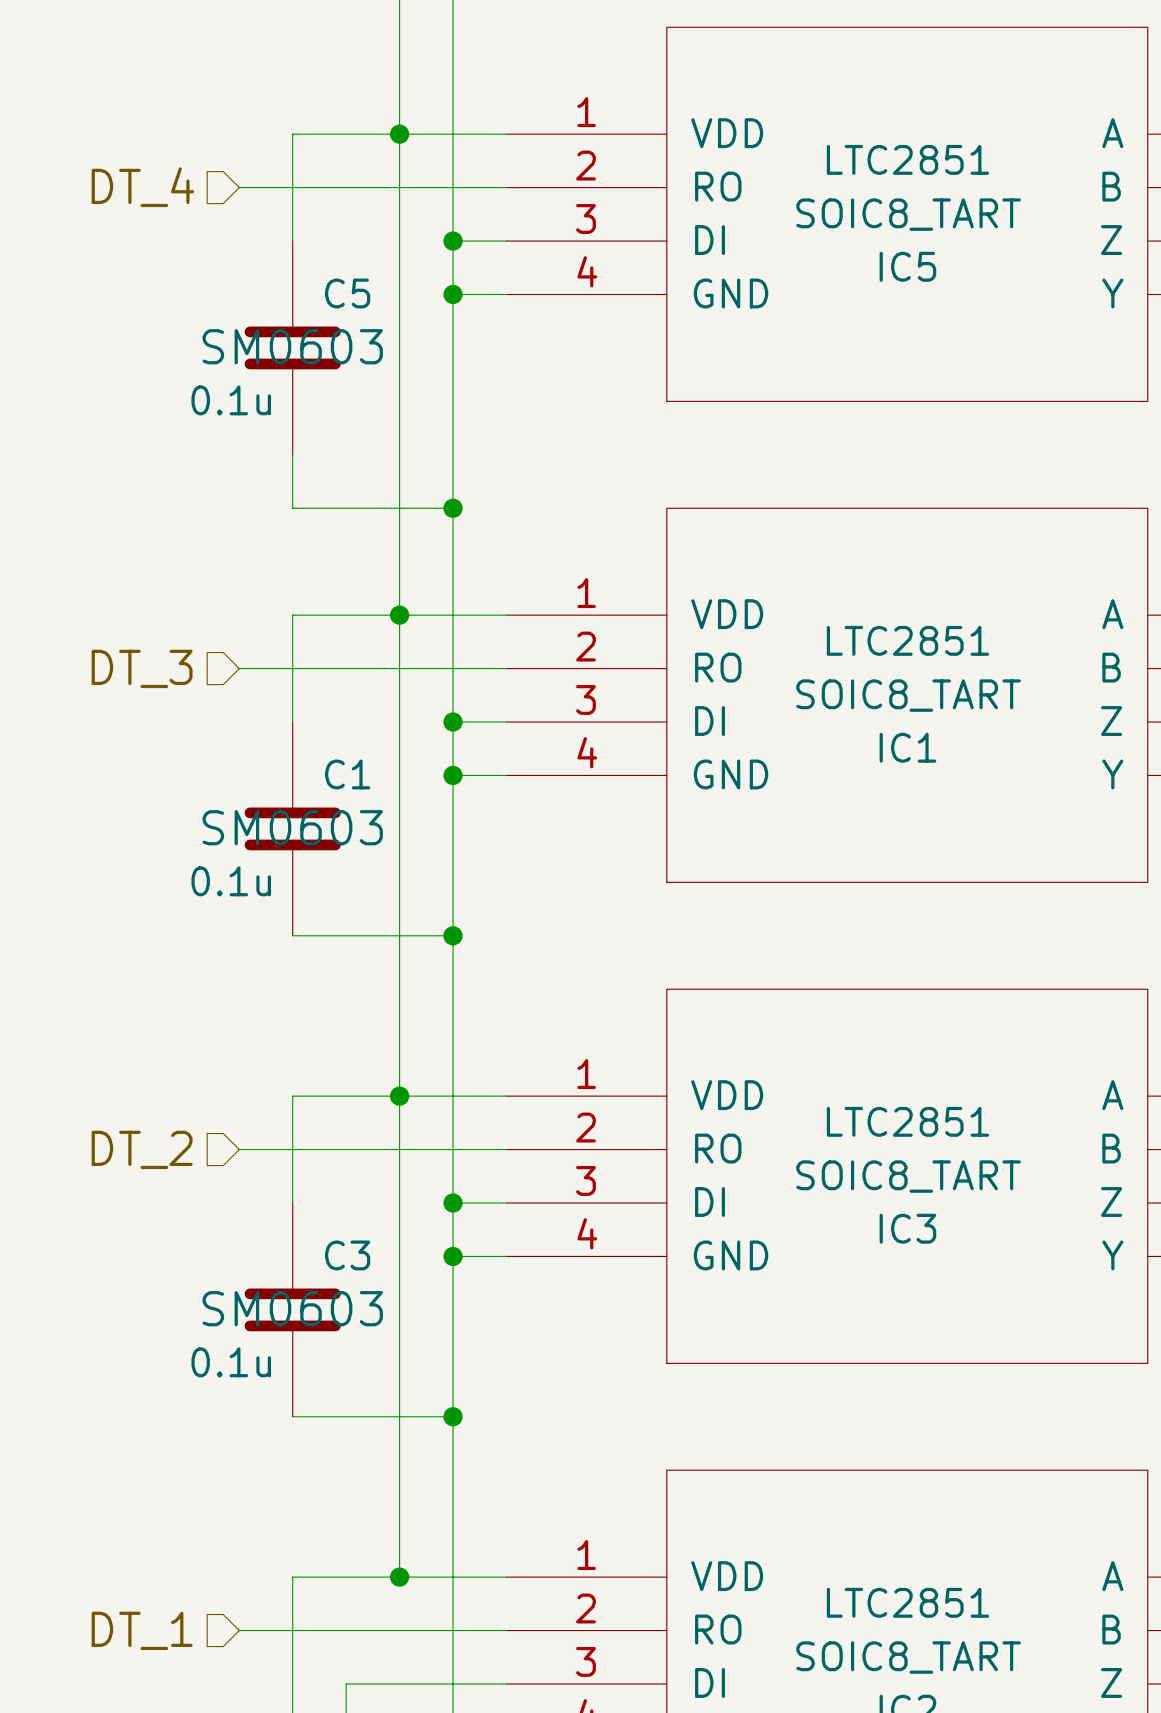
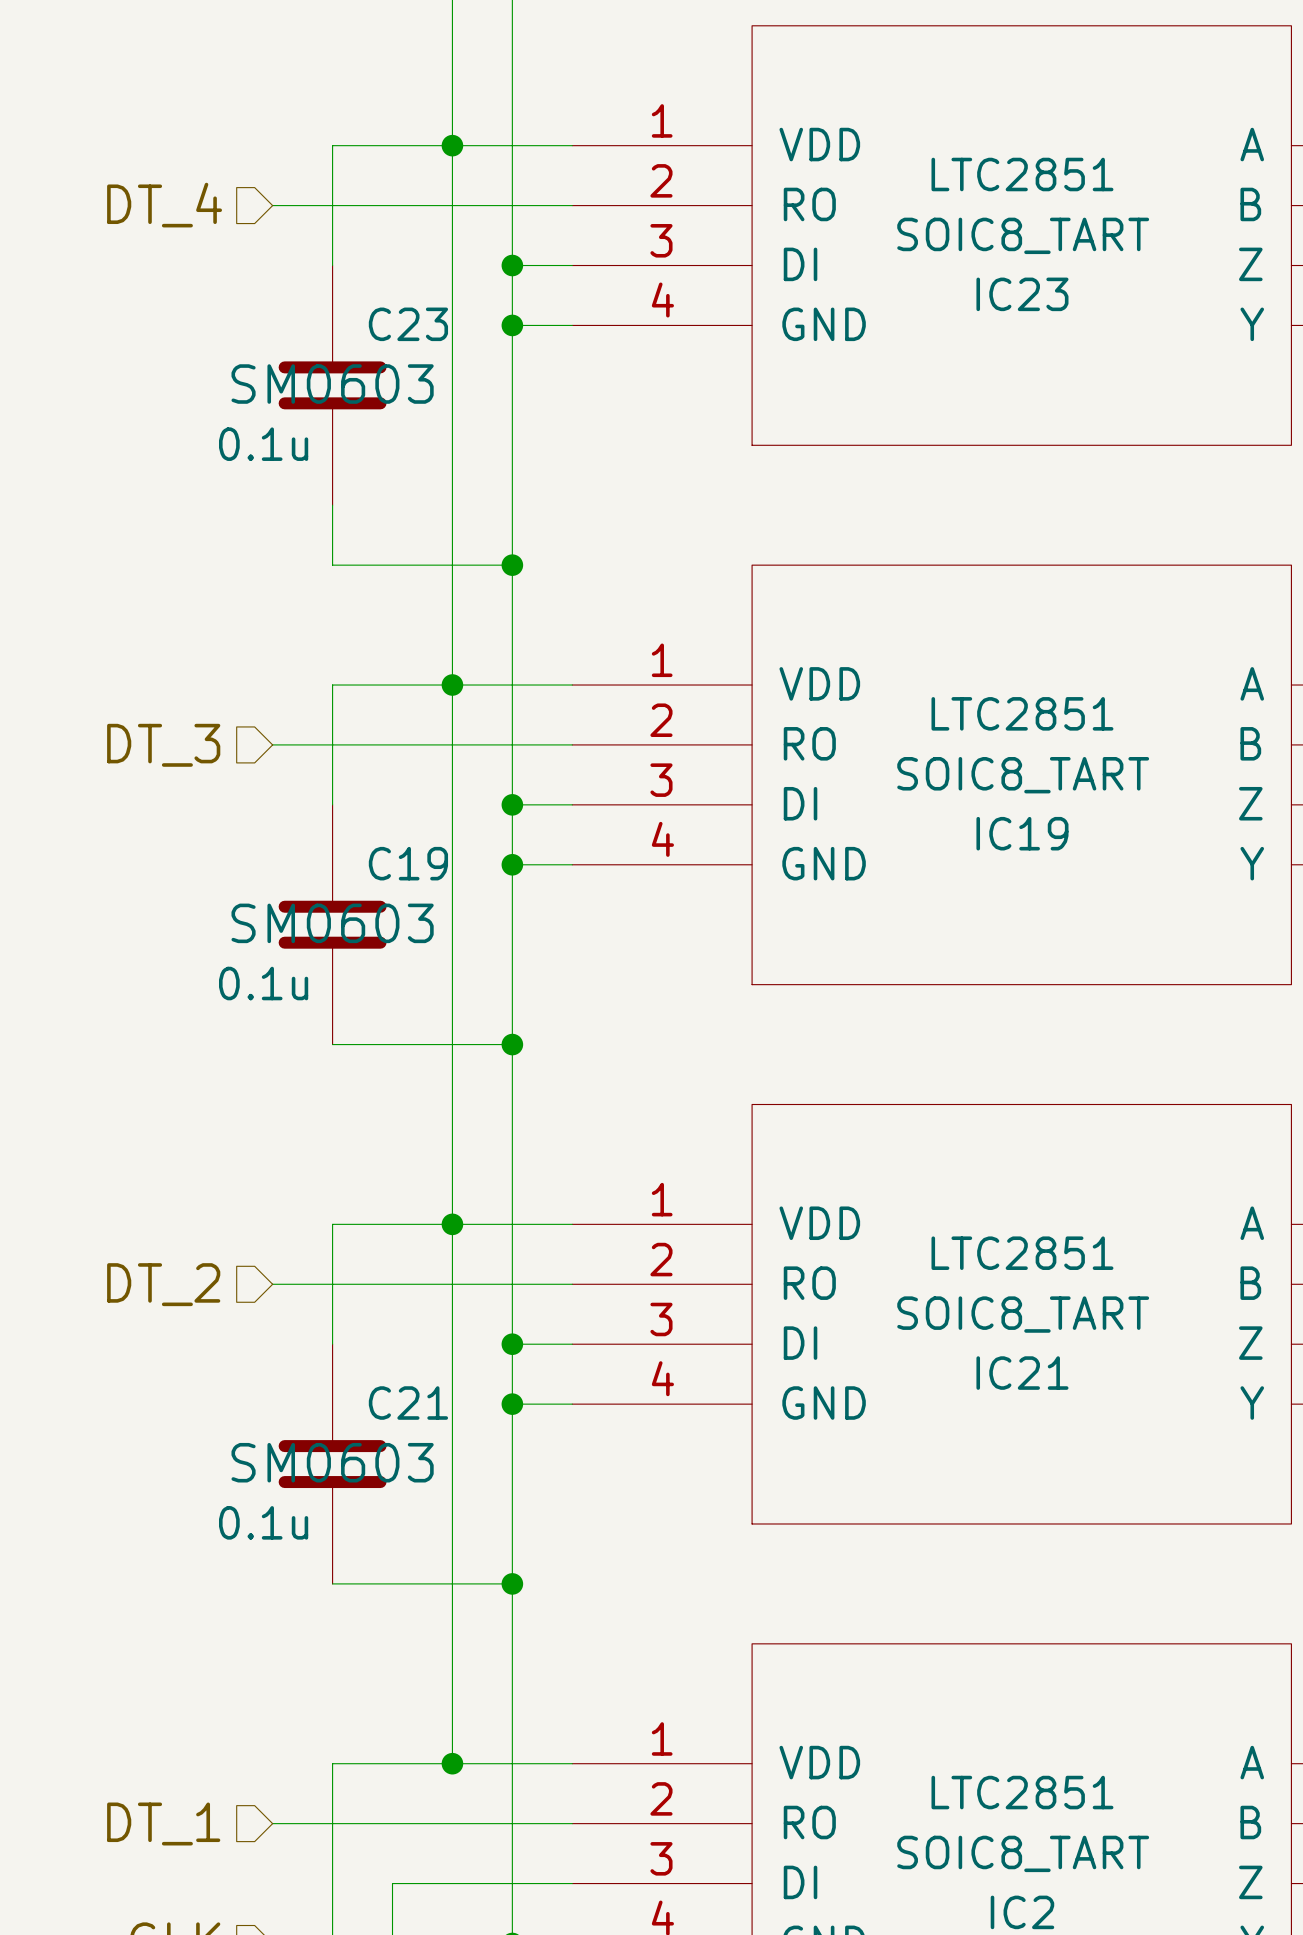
IC5 name: IC5 (907, 266) -> IC23 (1022, 294)
C5 name: C5 (347, 293) -> C23 (408, 324)
IC1 name: IC1 (907, 747) -> IC19 (1022, 833)
C1 name: C1 (347, 774) -> C19 (408, 863)
IC3 name: IC3 (907, 1228) -> IC21 (1022, 1373)
C3 name: C3 (347, 1255) -> C21 (408, 1403)

